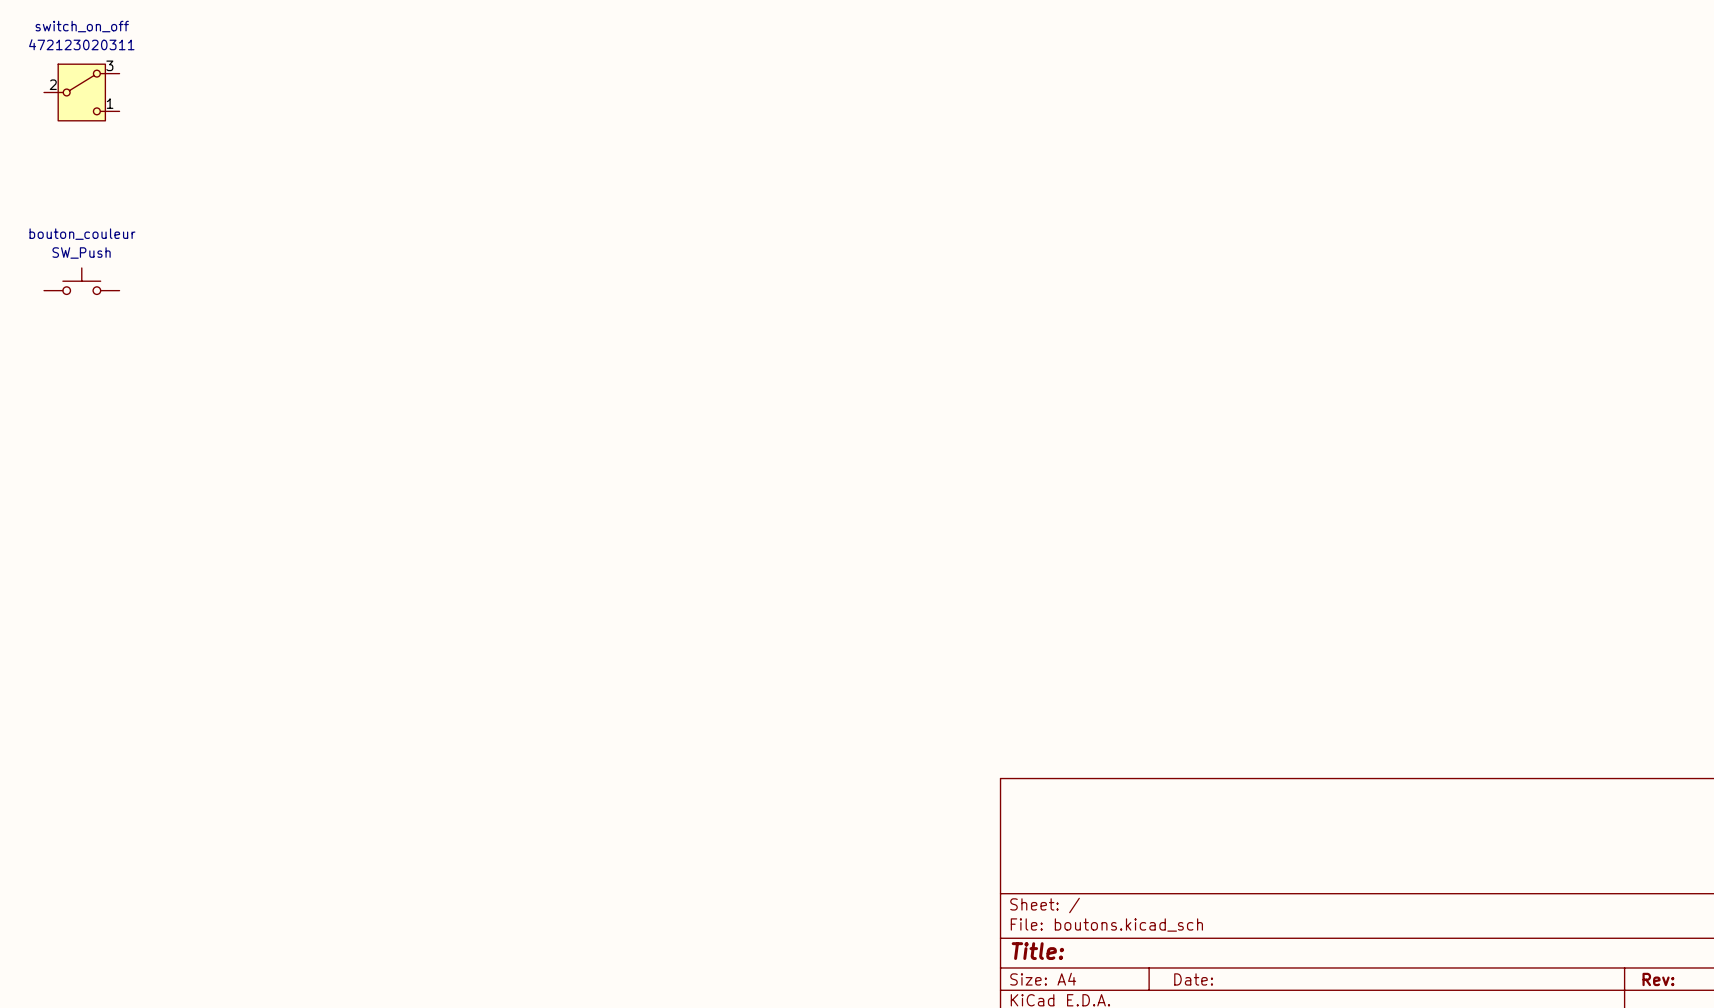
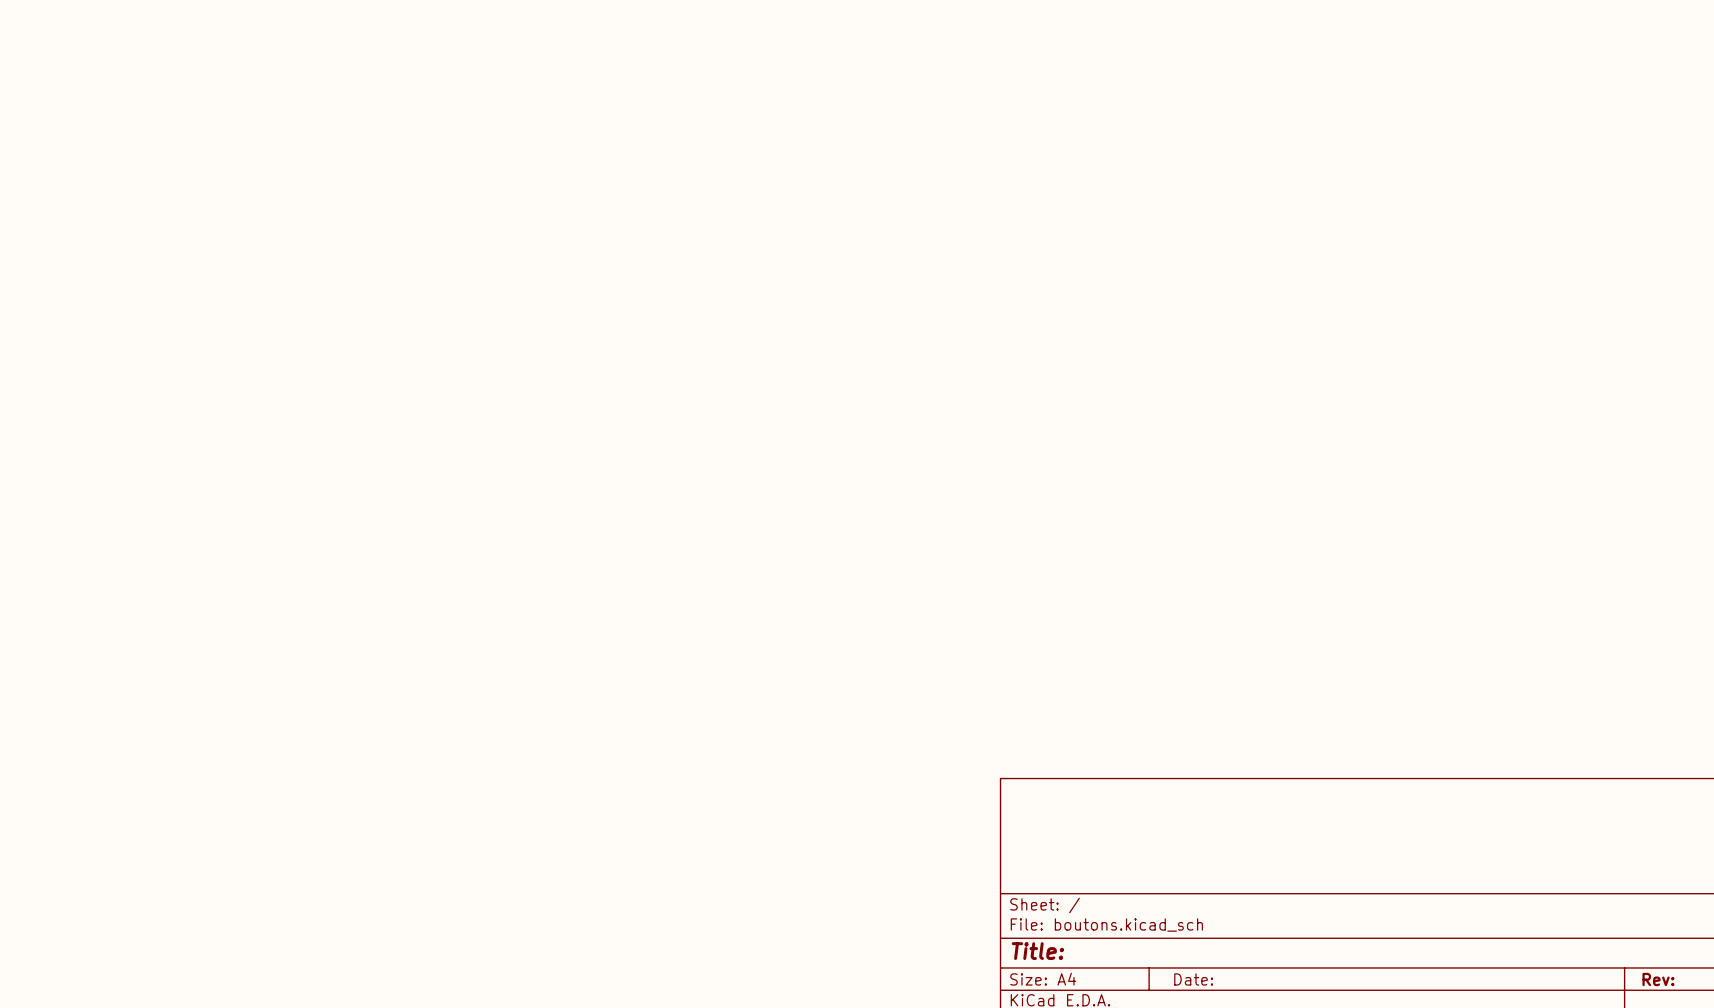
switch_on_off: 472123020311 (81, 92) -> none
bouton_couleur: SW_Push (81, 281) -> none

